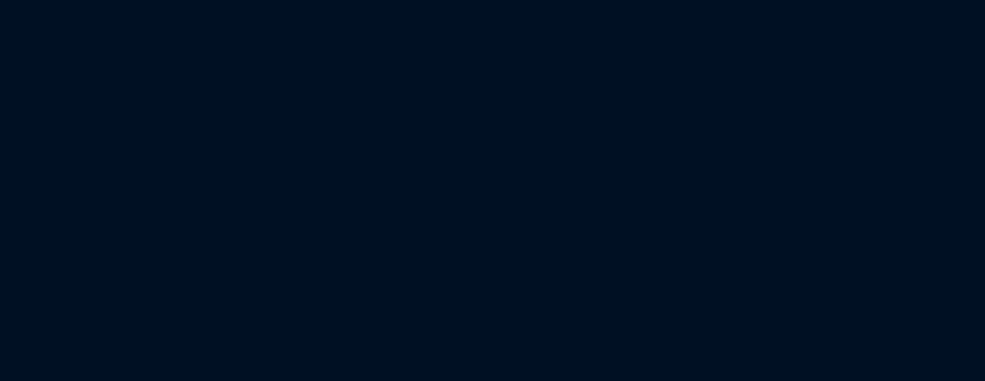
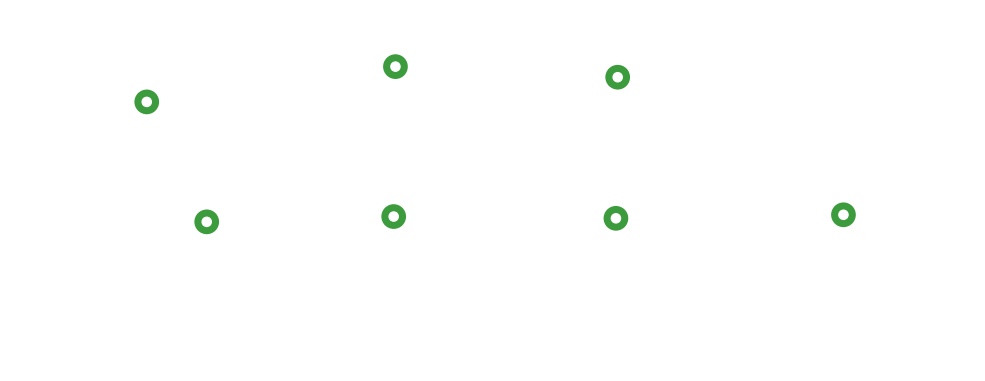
via: none -> (395, 66)
via: none -> (617, 77)
via: none -> (146, 101)
via: none -> (843, 214)
via: none -> (393, 216)
via: none -> (615, 218)
via: none -> (206, 221)

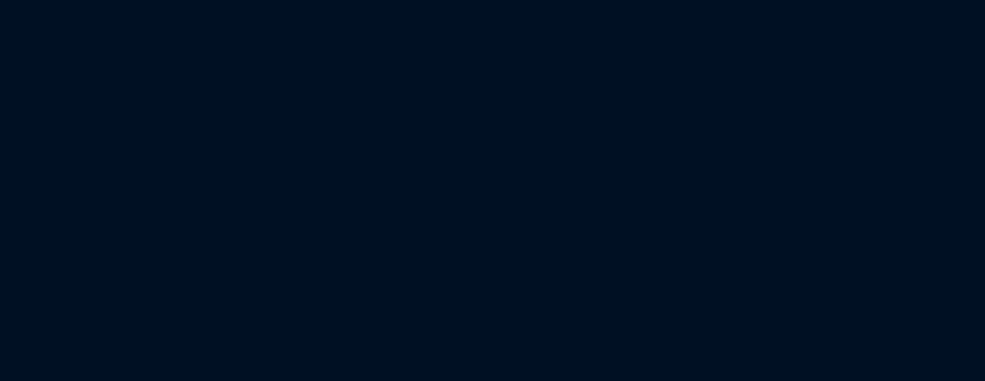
via: (395, 66) -> none
via: (617, 77) -> none
via: (146, 101) -> none
via: (843, 214) -> none
via: (393, 216) -> none
via: (615, 218) -> none
via: (206, 221) -> none

